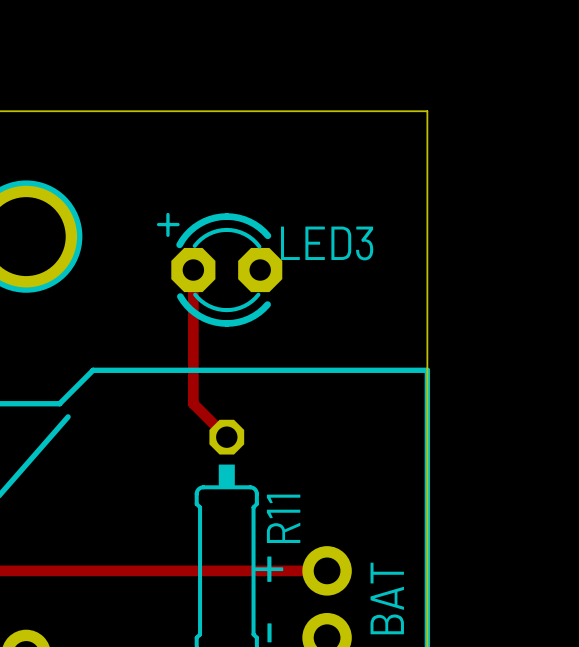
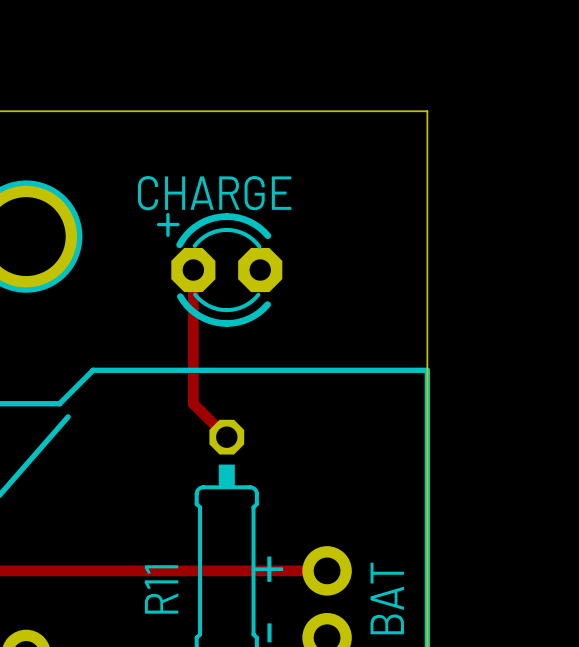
LED3 name: LED3 (327, 243) -> CHARGE (214, 193)
R11 name position: R11 (283, 518) -> R11 (161, 589)

